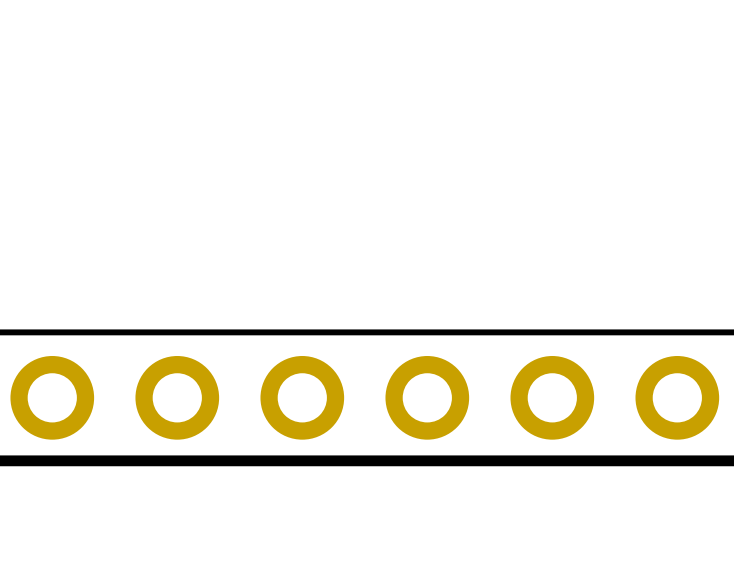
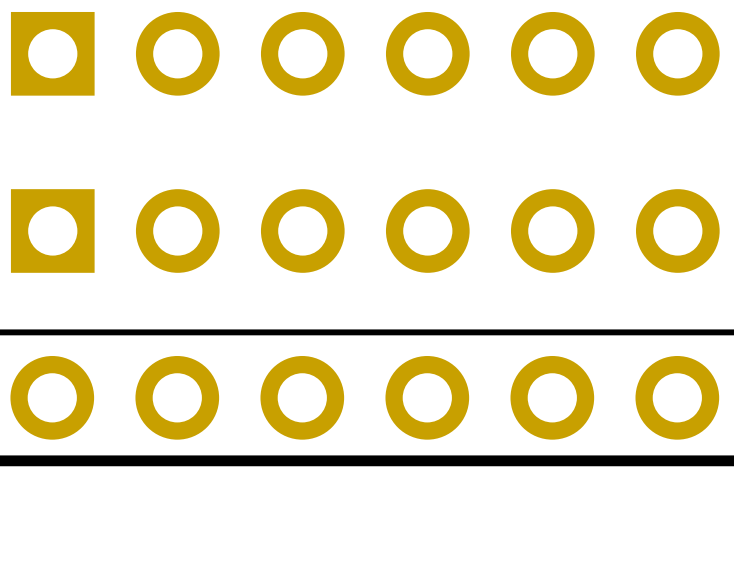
part: none -> (365, 53)
part: none -> (365, 230)

